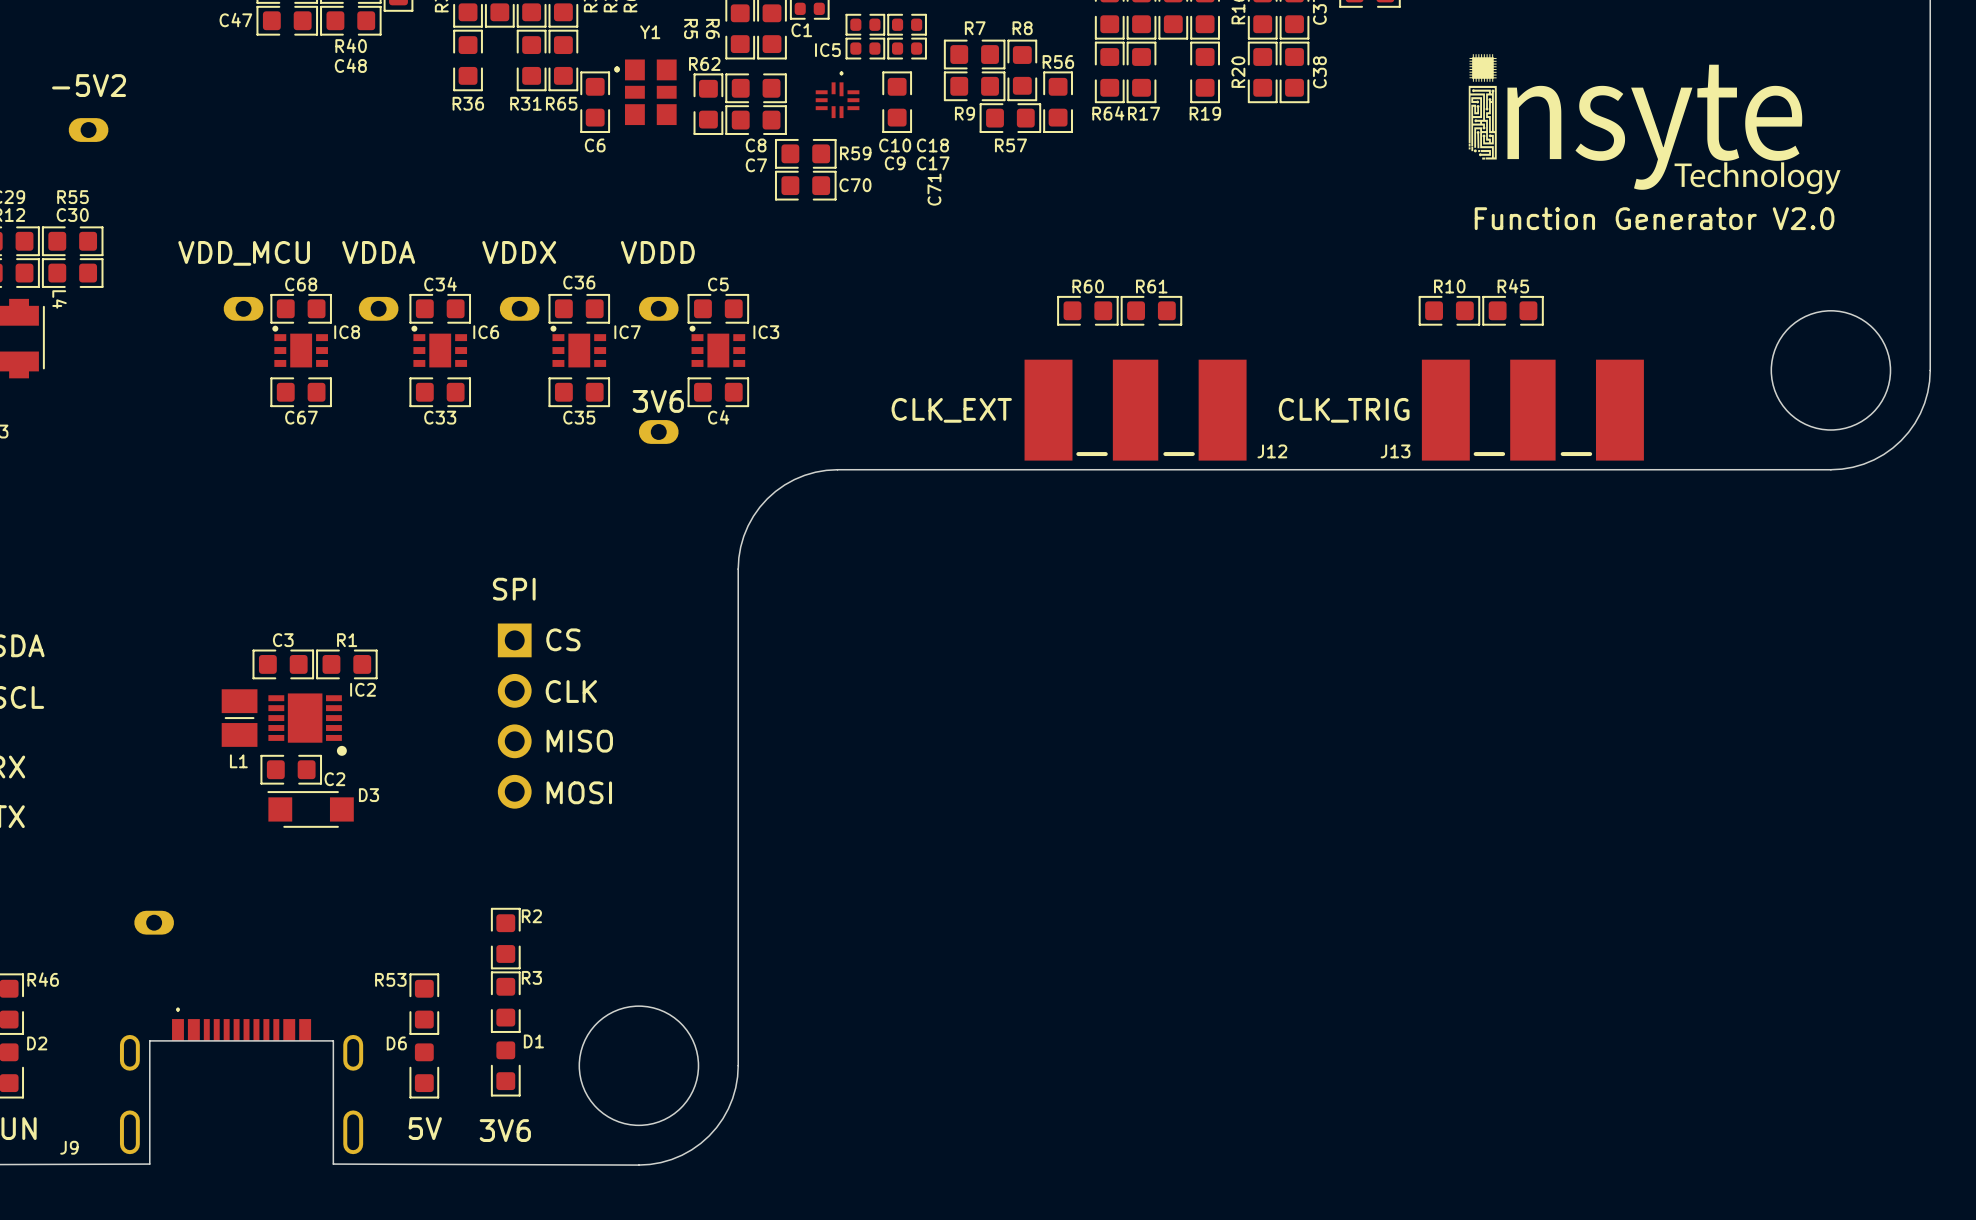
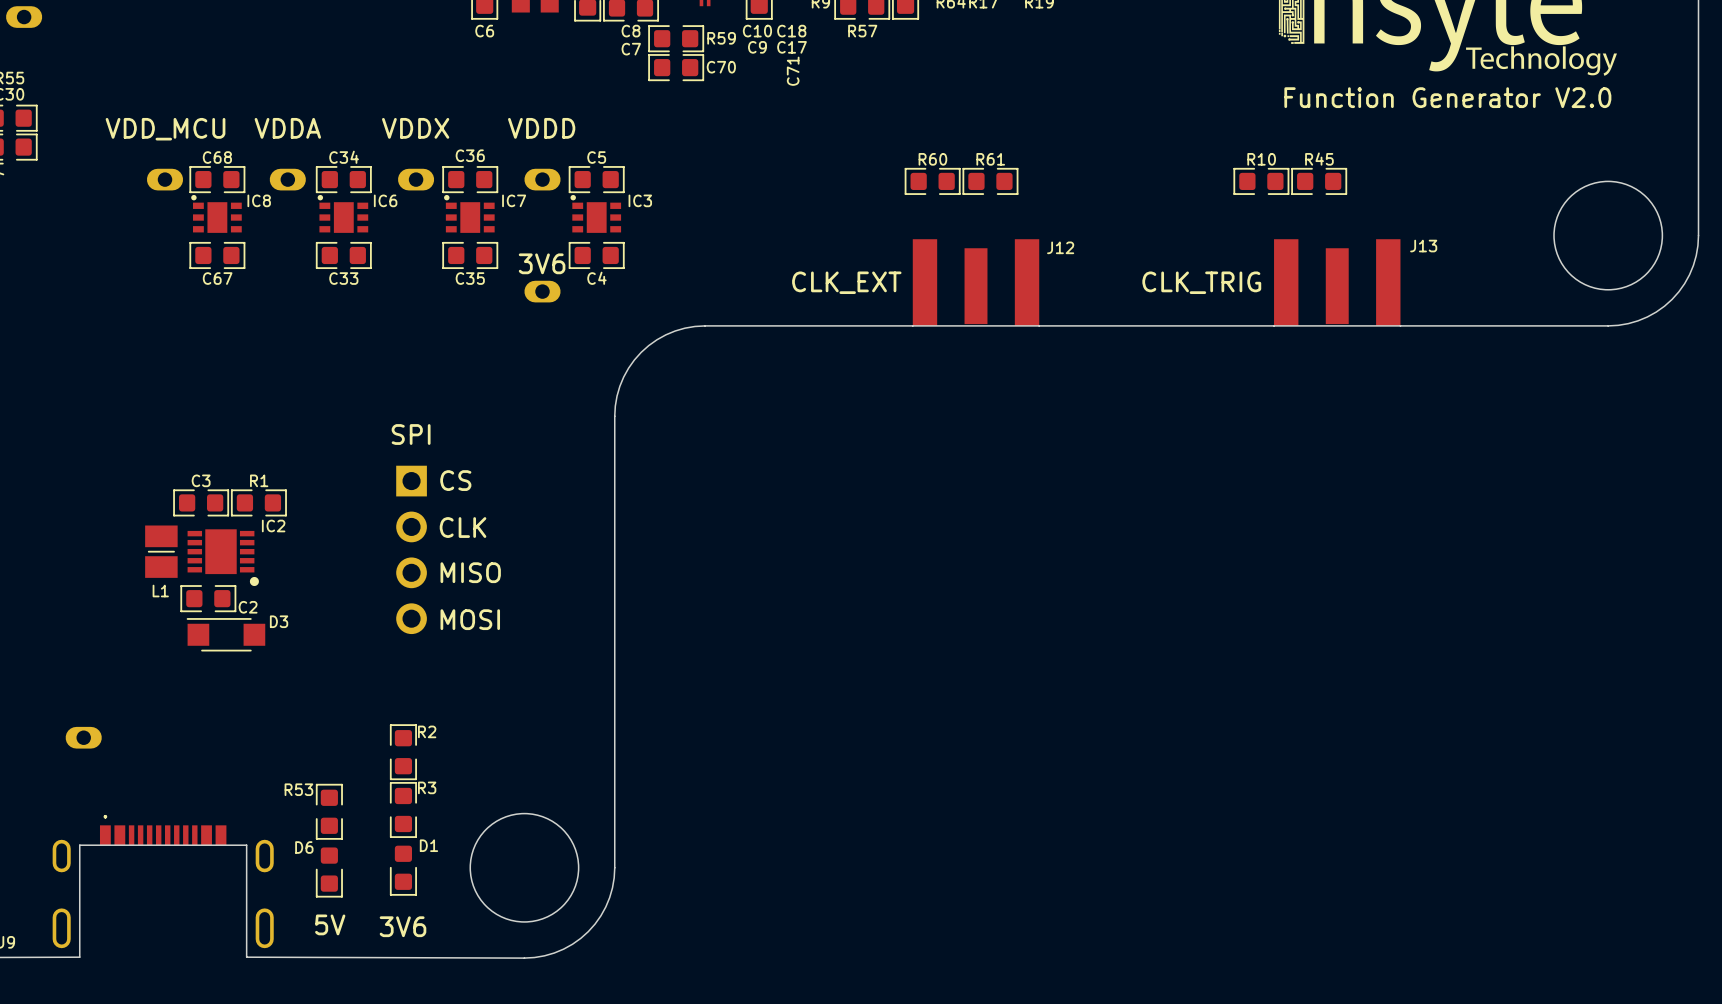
J12 footprint: [1024, 359, 1247, 461] -> [912, 239, 1040, 327]
J13 footprint: [1421, 359, 1644, 461] -> [1273, 239, 1401, 327]
text position: CLK_EXT (951, 410) -> CLK_EXT (846, 282)
text position: CLK_TRIG (1344, 410) -> CLK_TRIG (1201, 282)
J12 name position: J12 (1272, 451) -> J12 (1060, 247)
J13 name position: J13 (1395, 451) -> J13 (1423, 246)
board edge: (1066, 469) (1205, 469) -> none
board edge: (1463, 469) (1602, 469) -> none

